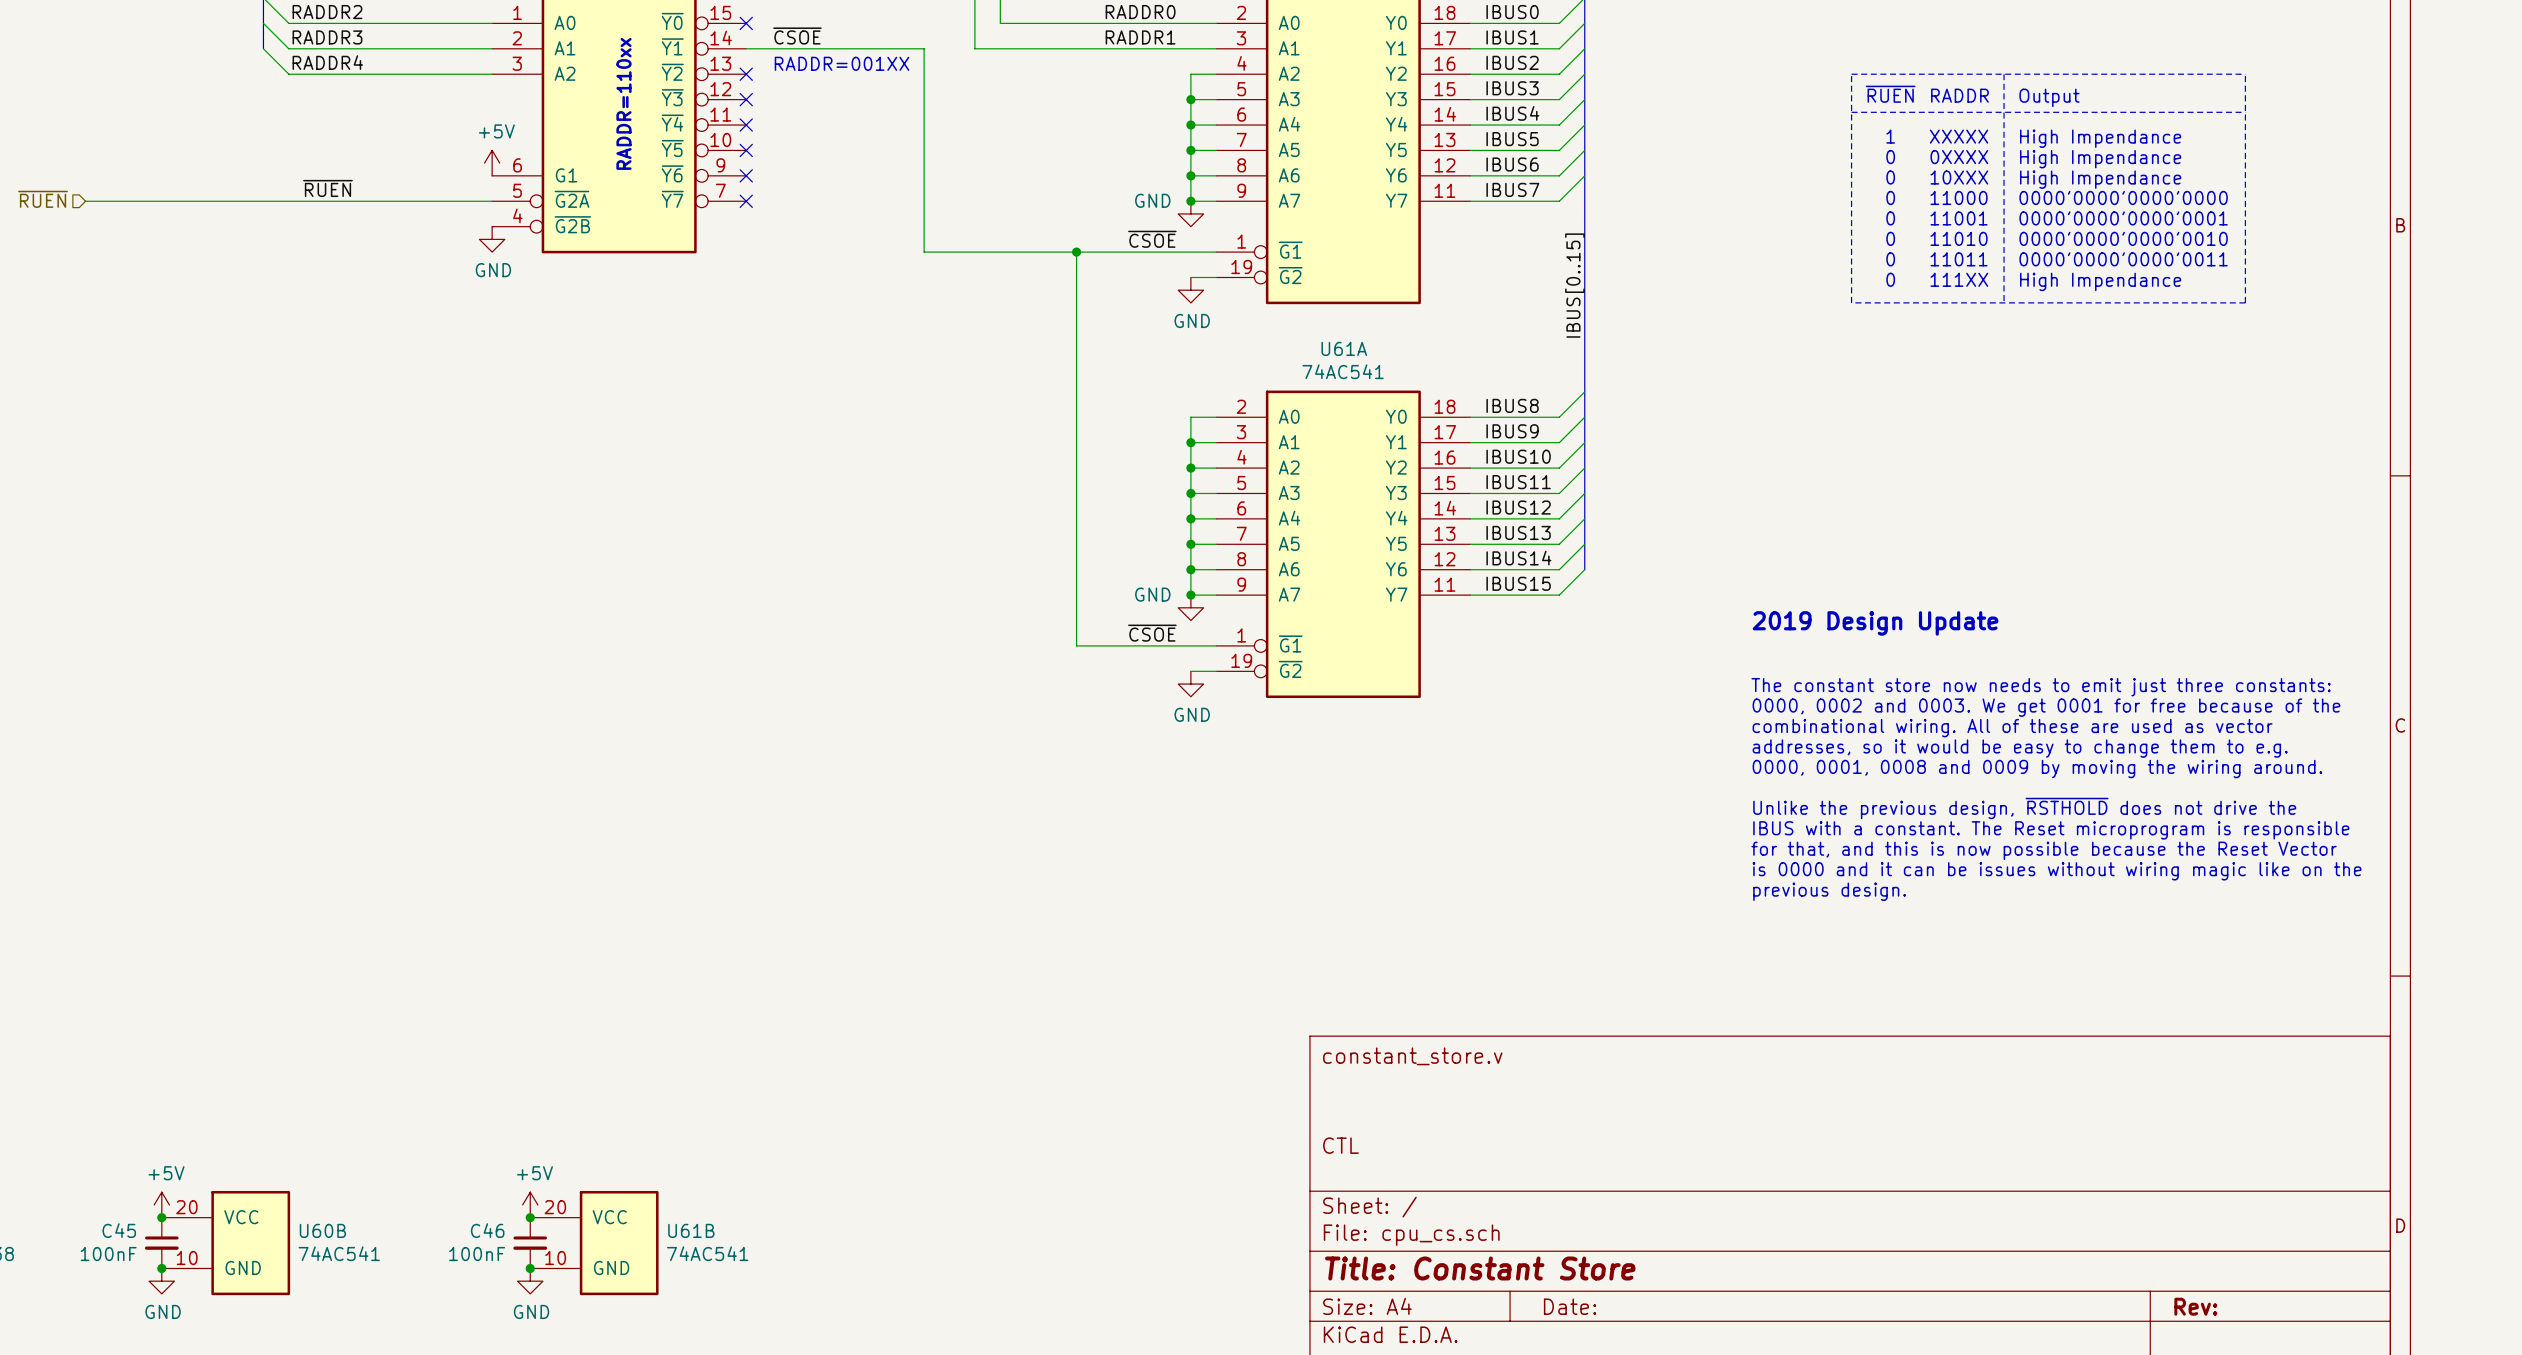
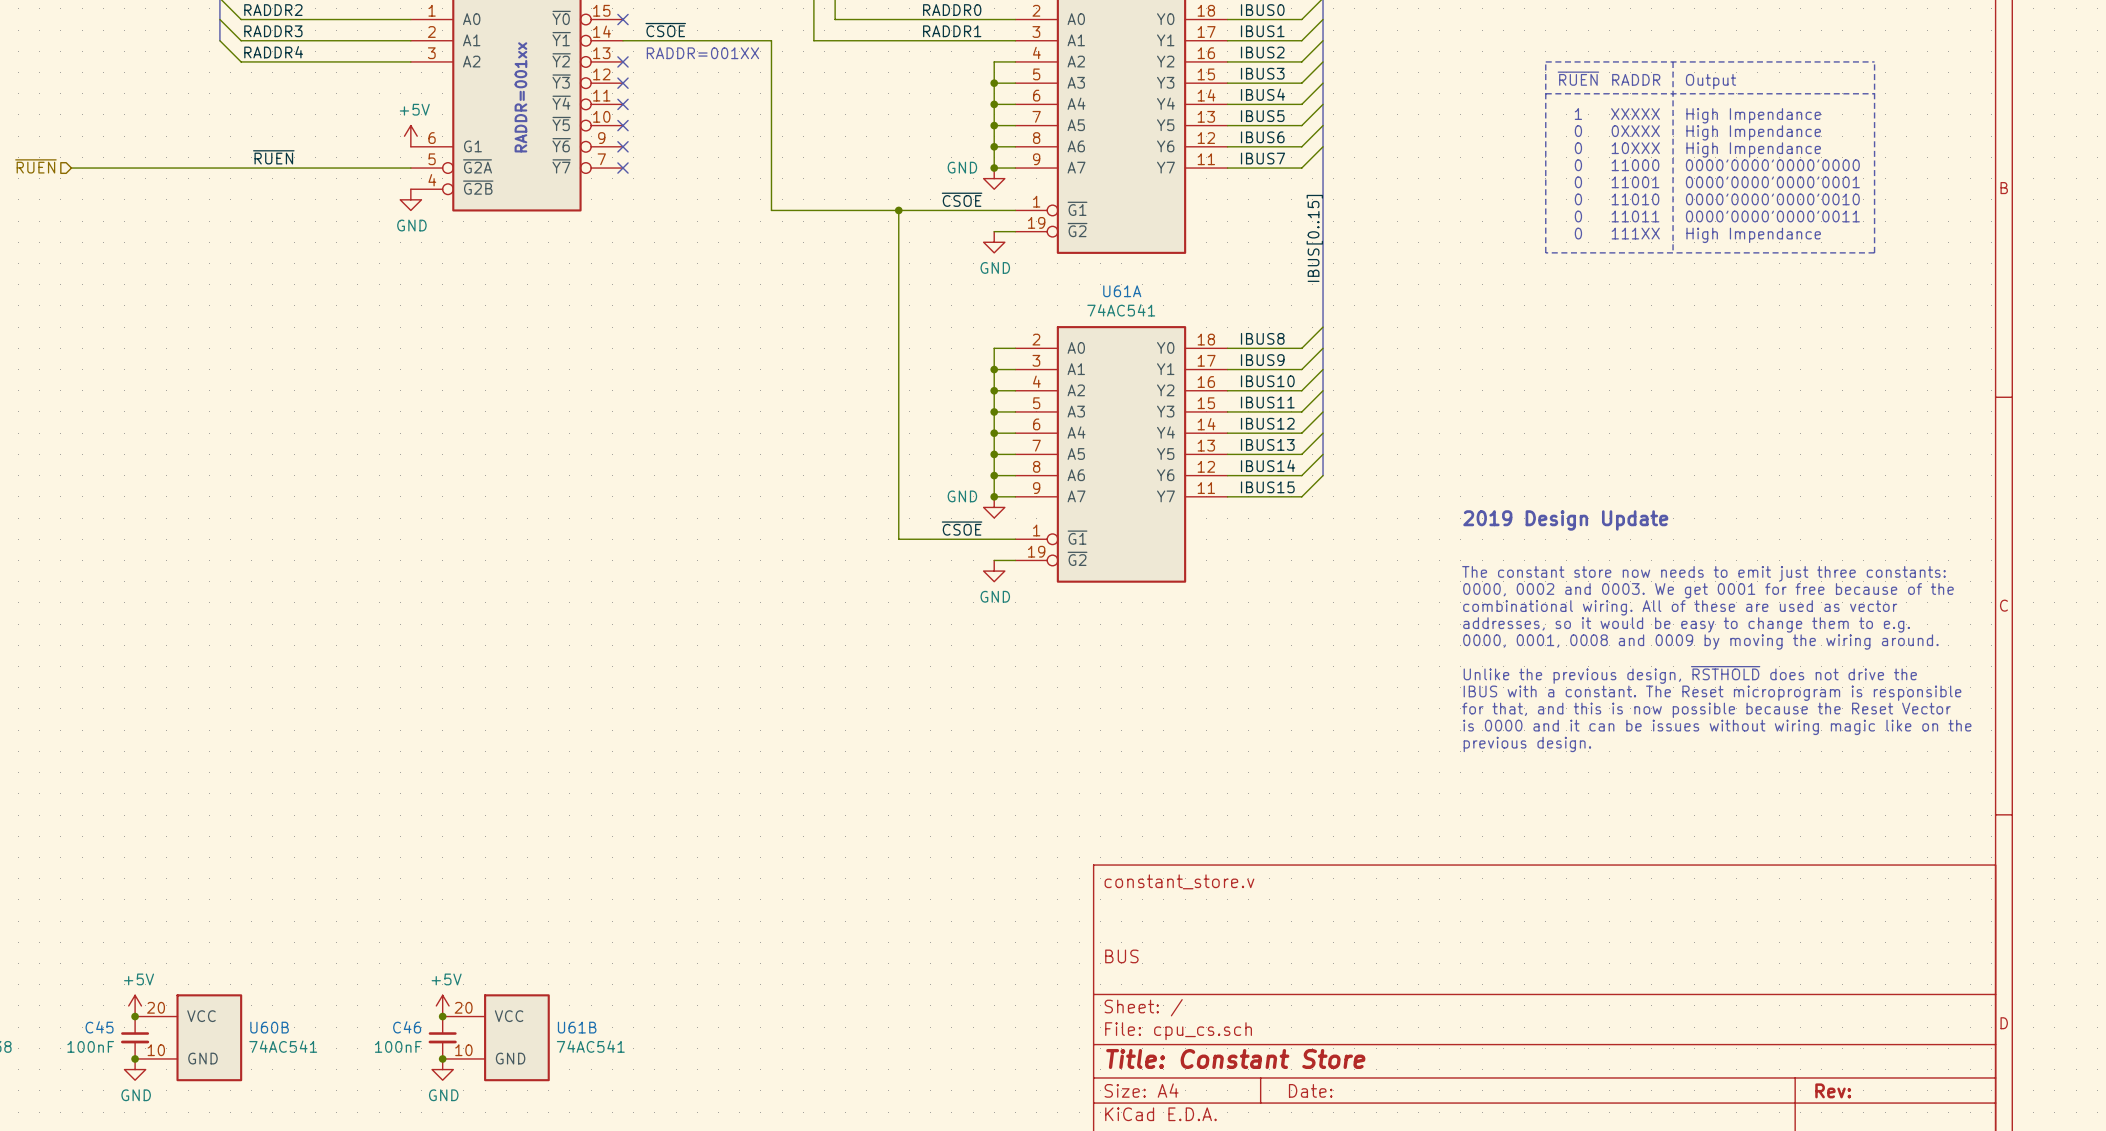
text: RADDR=110xx (623, 103) -> RADDR=001xx (520, 97)
title block: CTL (1340, 1145) -> BUS (1121, 956)

